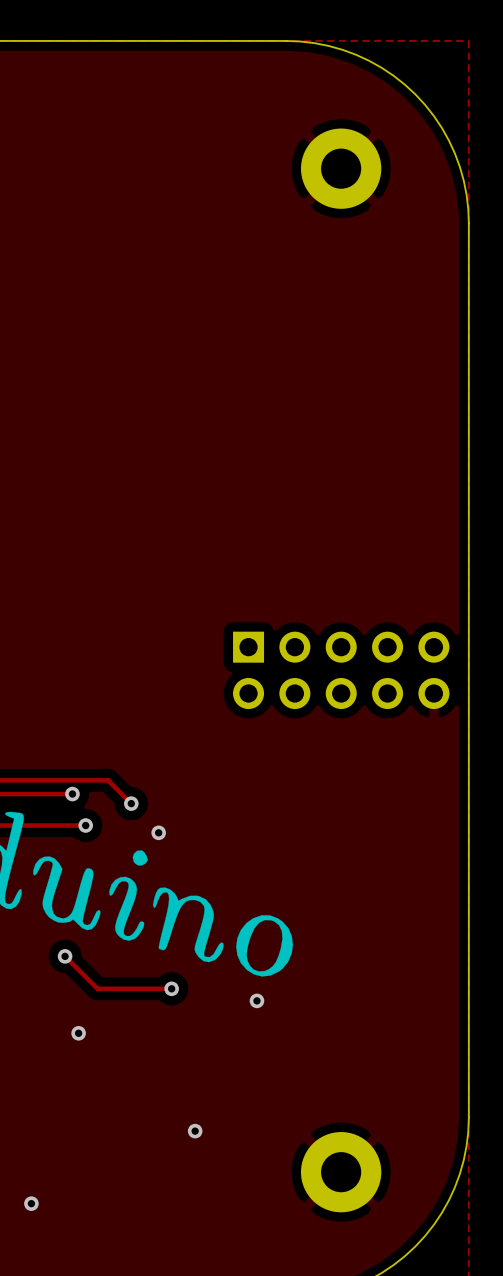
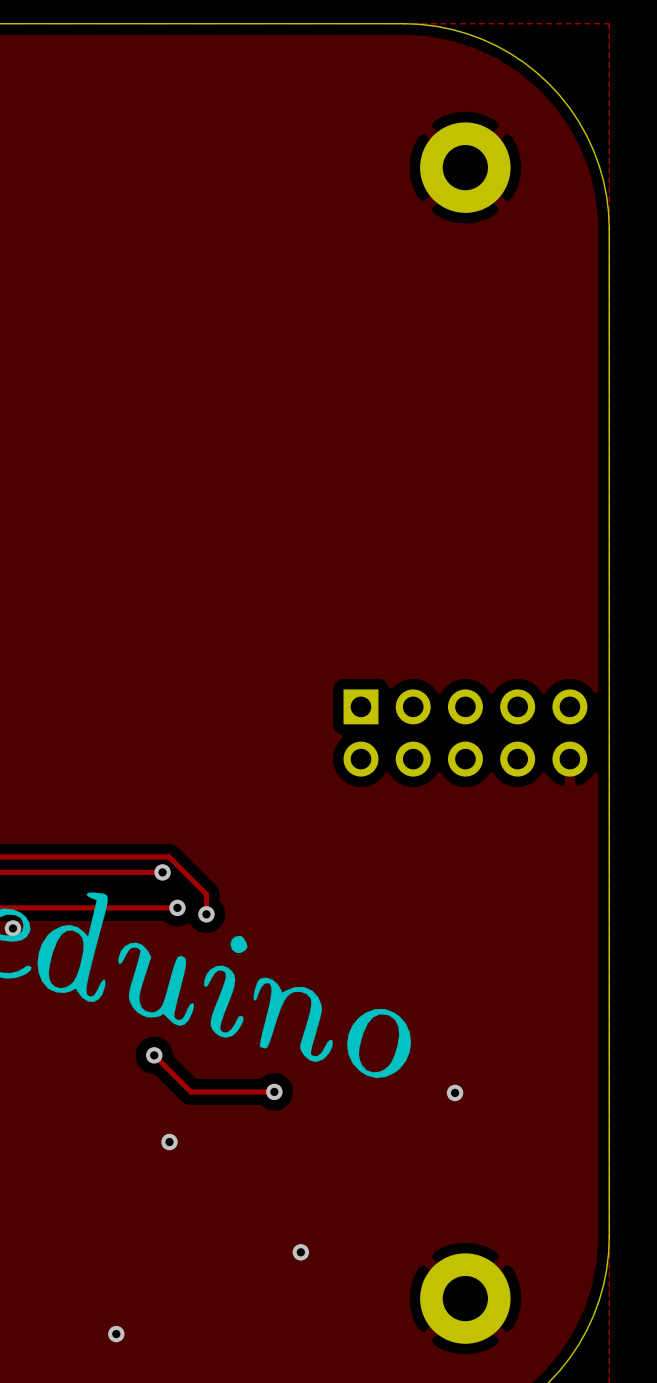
track: (78, 780) (108, 780) (131, 803) -> (169, 856) (206, 894) (206, 914)
via: (131, 803) -> none
via: none -> (206, 914)
via: (158, 832) -> none
via position: (256, 1000) -> (455, 1092)

